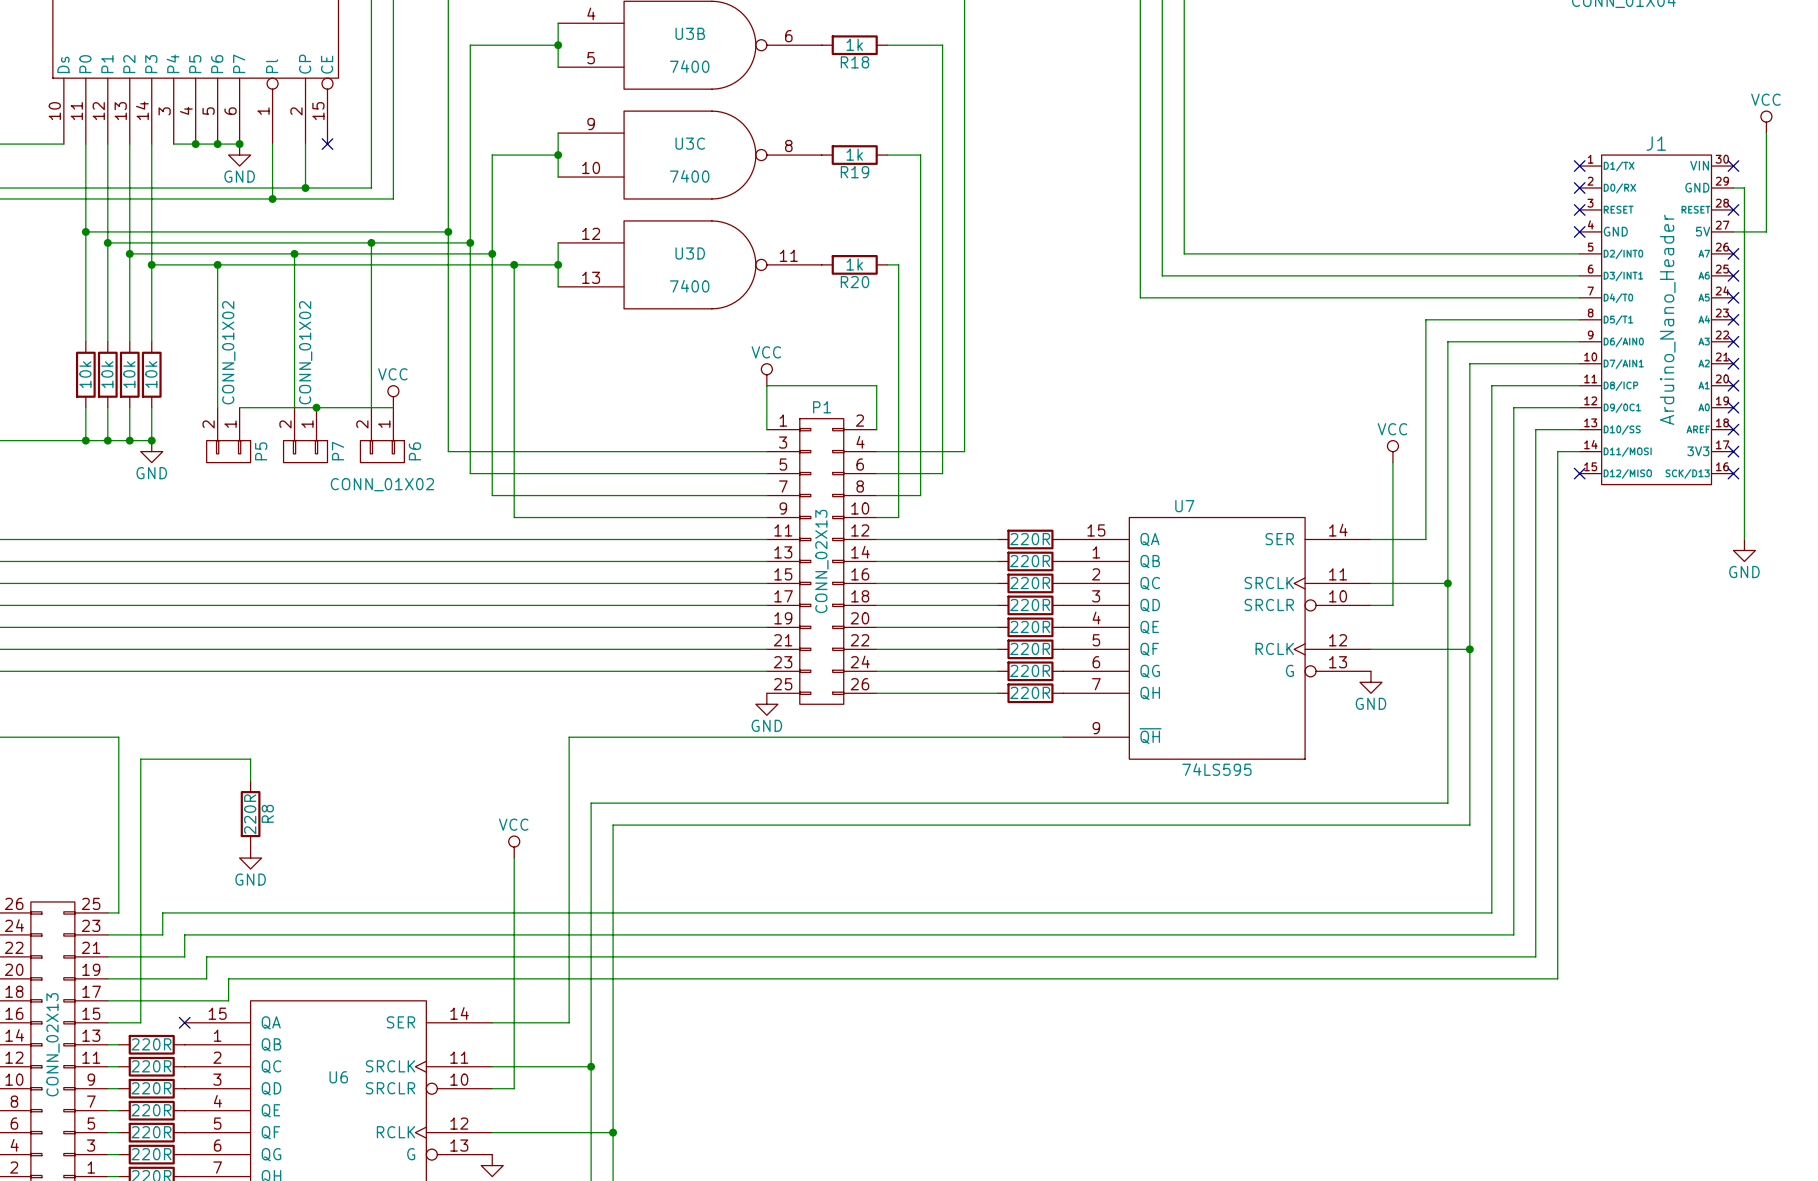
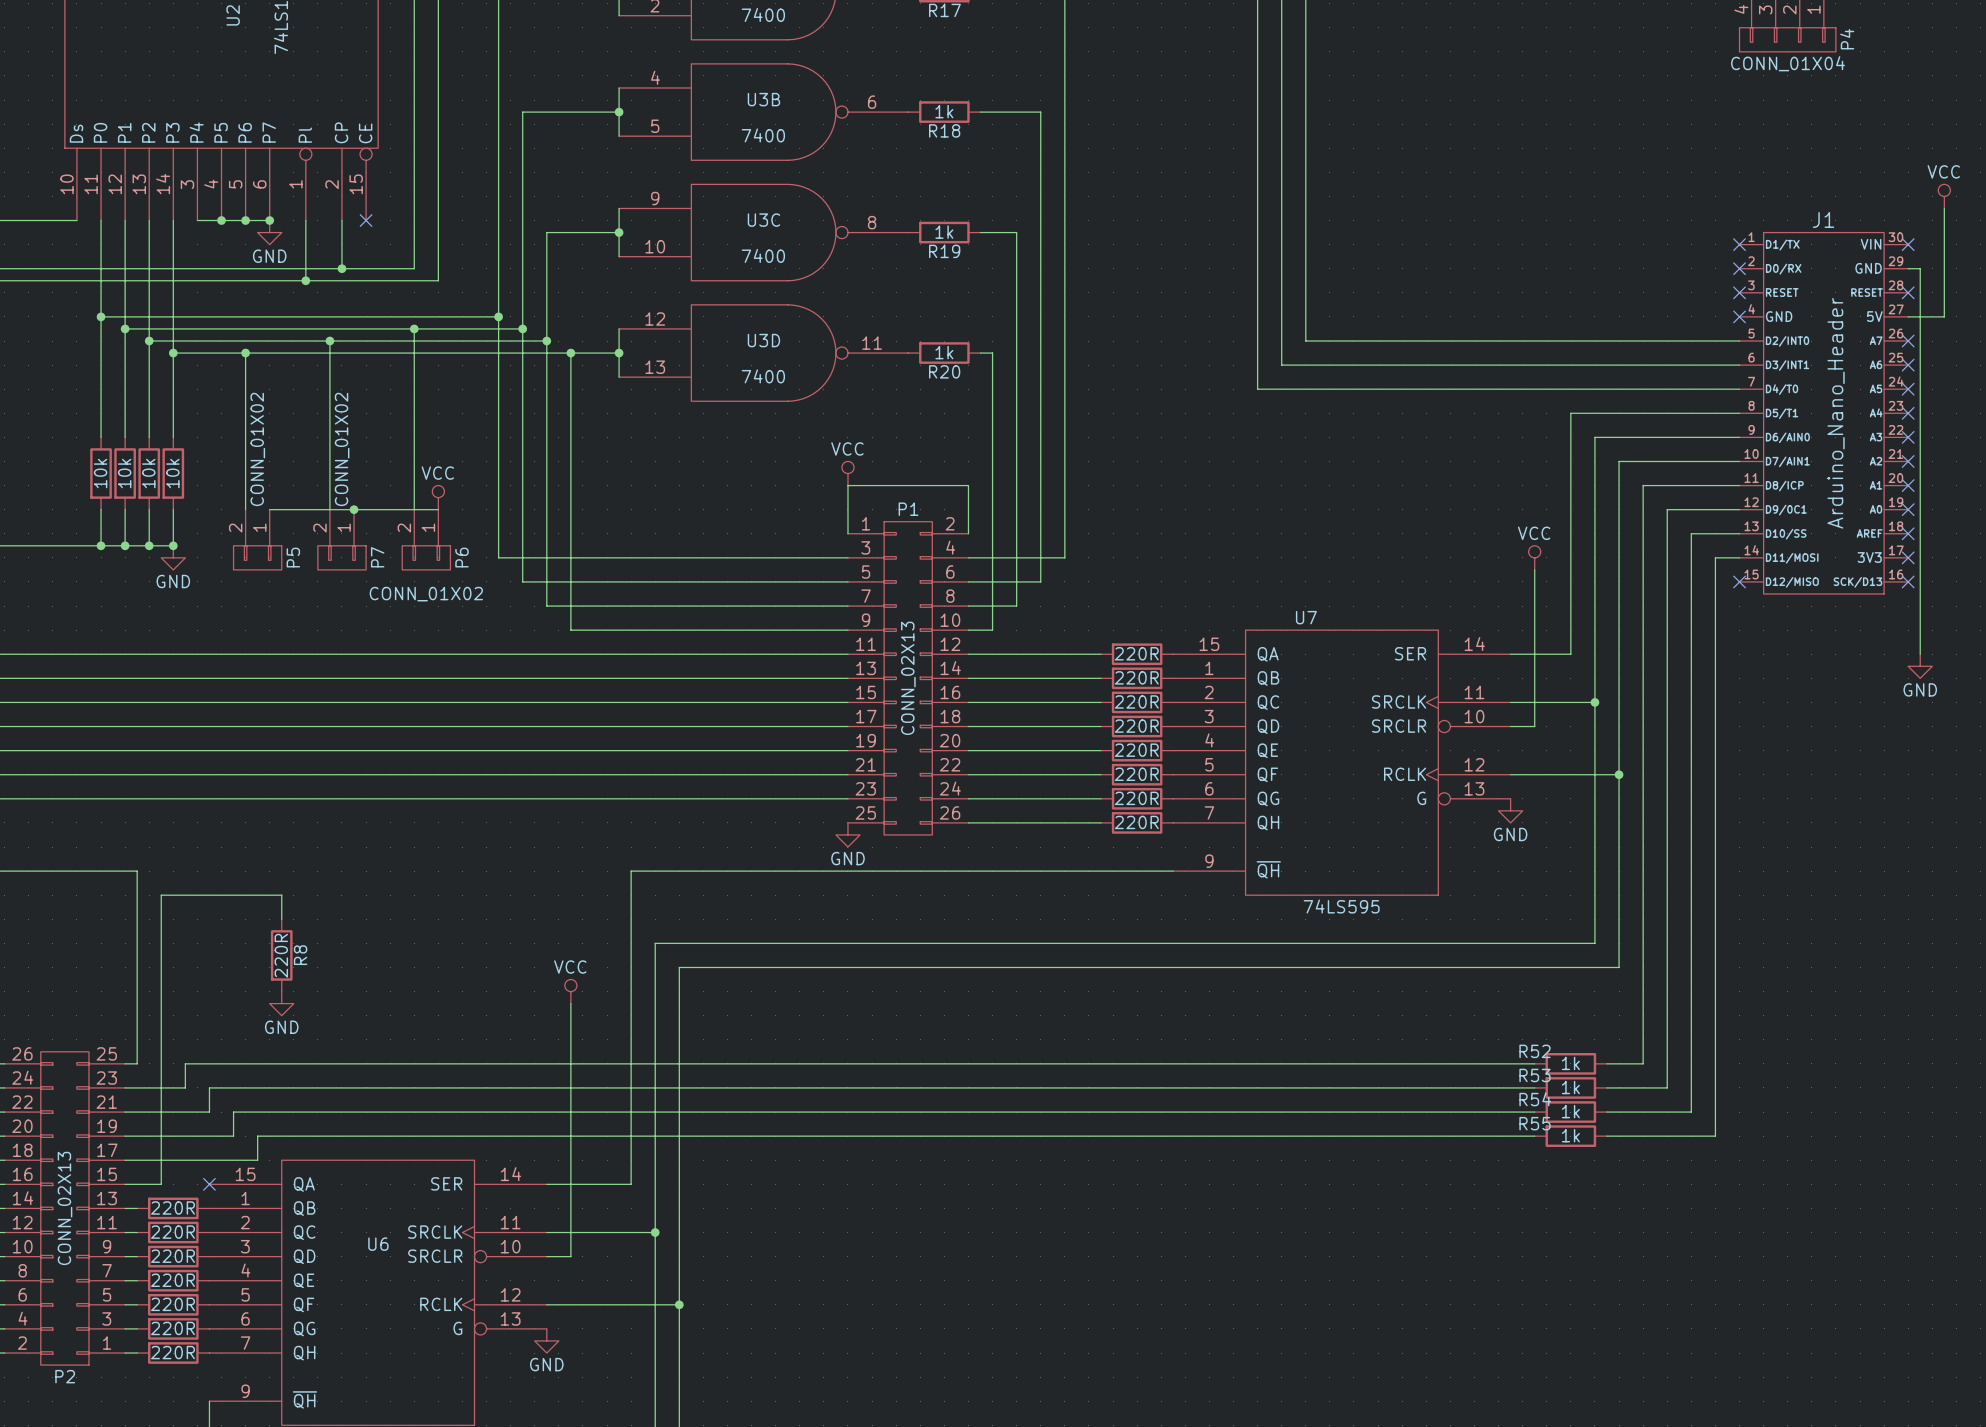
wire: (1392, 912) (1458, 912) -> none
R52: none -> 1k (1570, 1063)
wire: (1392, 934) (1458, 934) -> none
R53: none -> 1k (1570, 1087)
wire: (1392, 956) (1458, 956) -> none
R54: none -> 1k (1570, 1112)
wire: (1392, 978) (1458, 978) -> none
R55: none -> 1k (1570, 1136)

